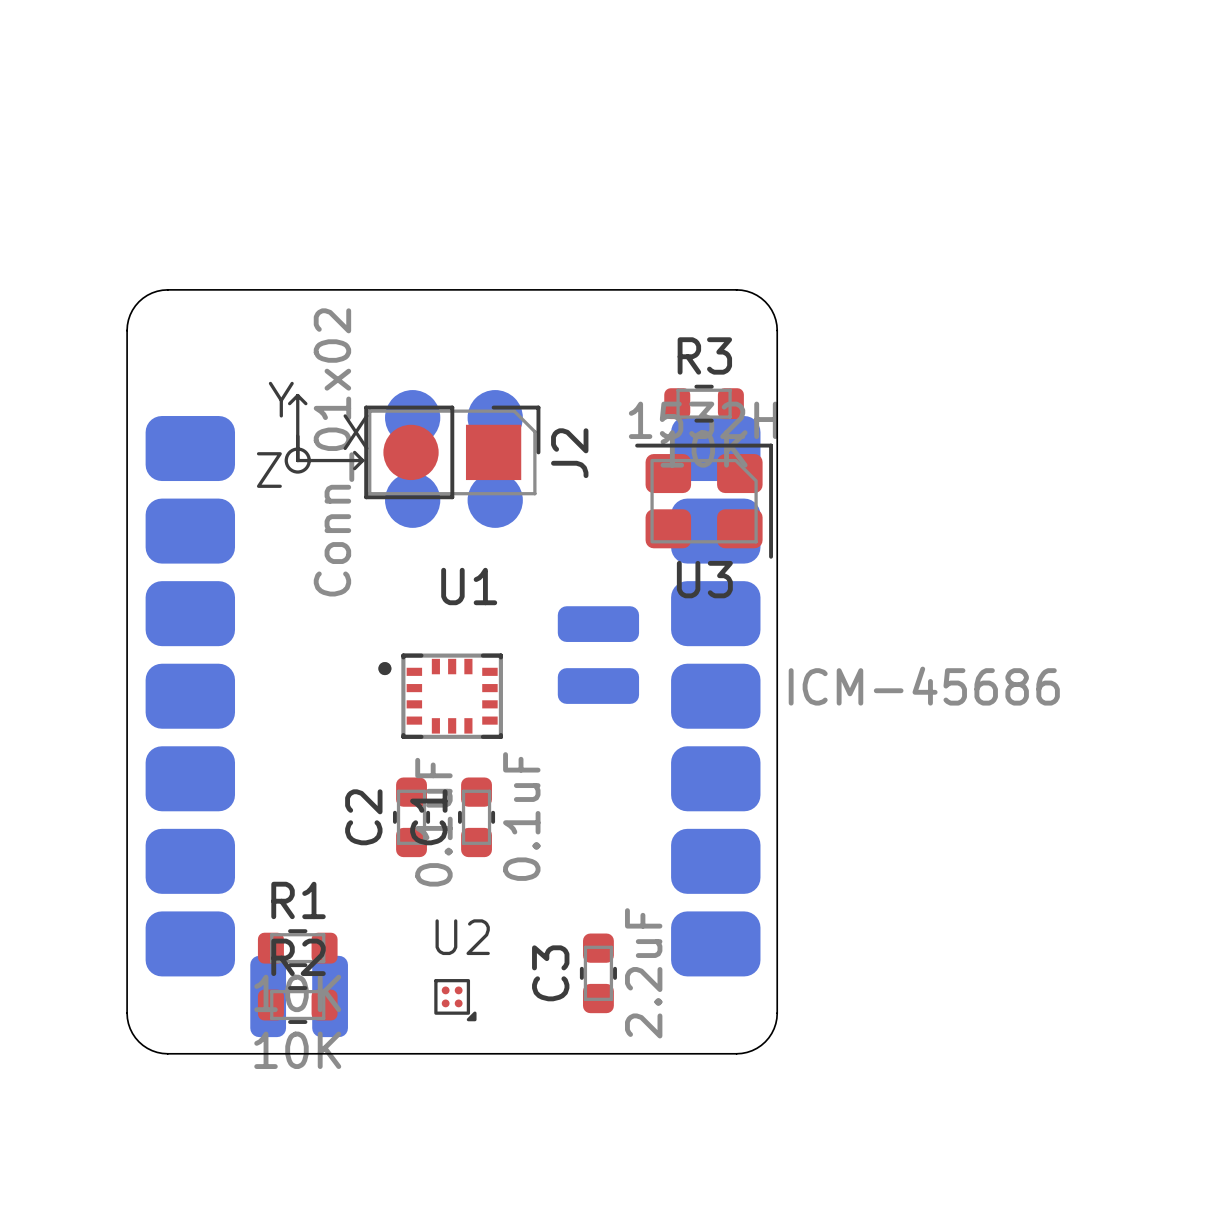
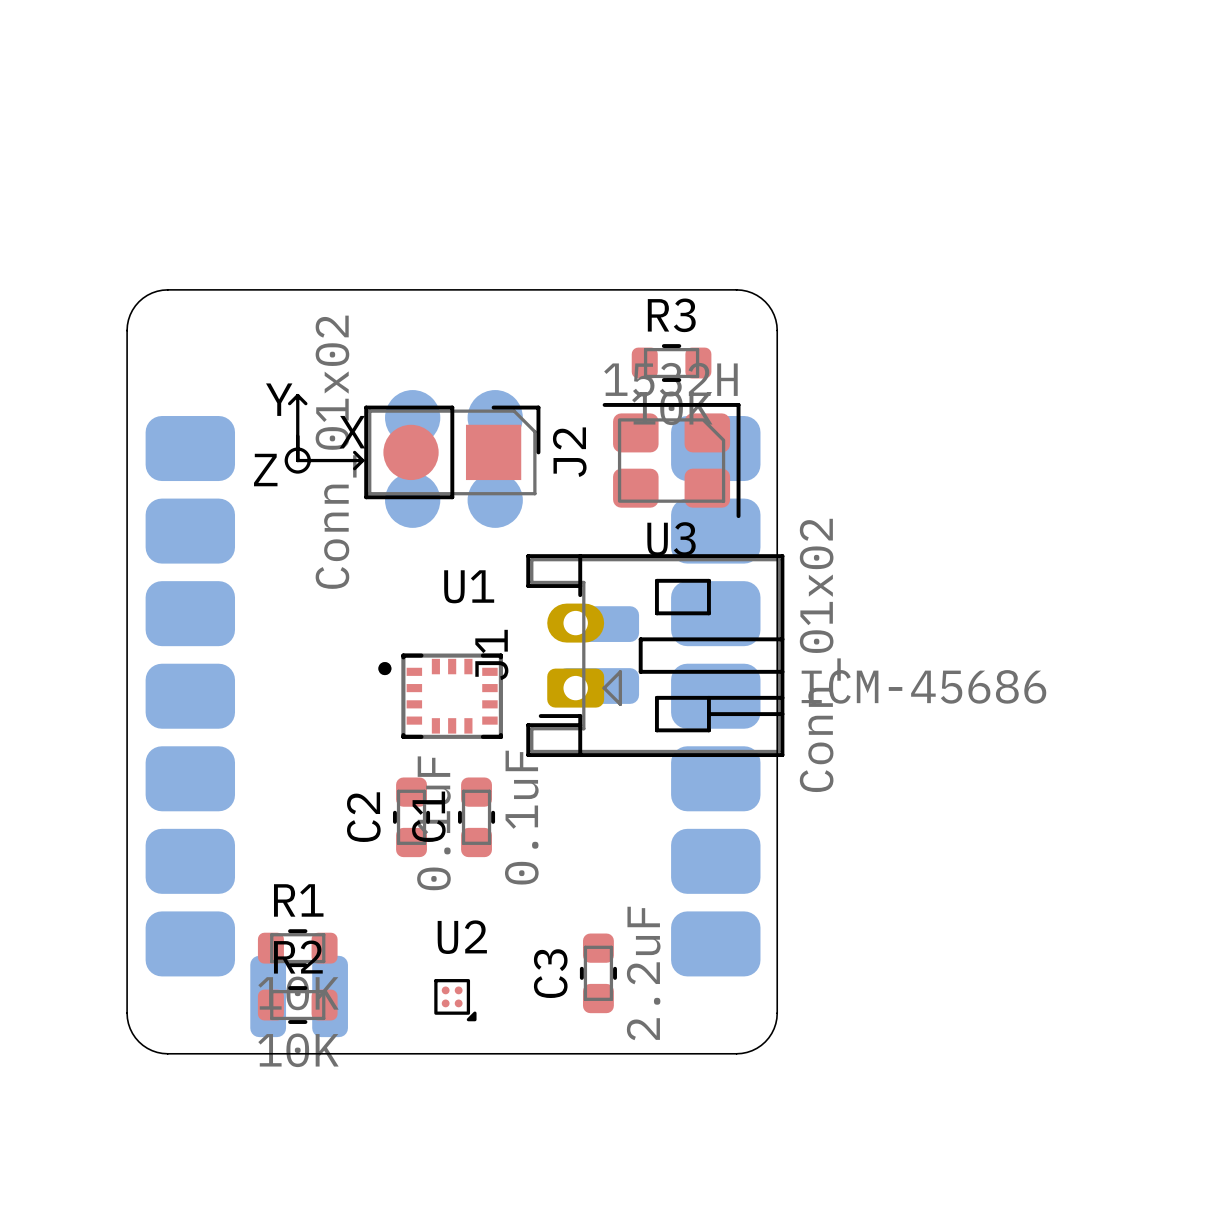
R3 position: (704, 403) -> (671, 363)
U3 position: (704, 501) -> (671, 460)
J1: none -> Conn_01x02 (655, 655)

